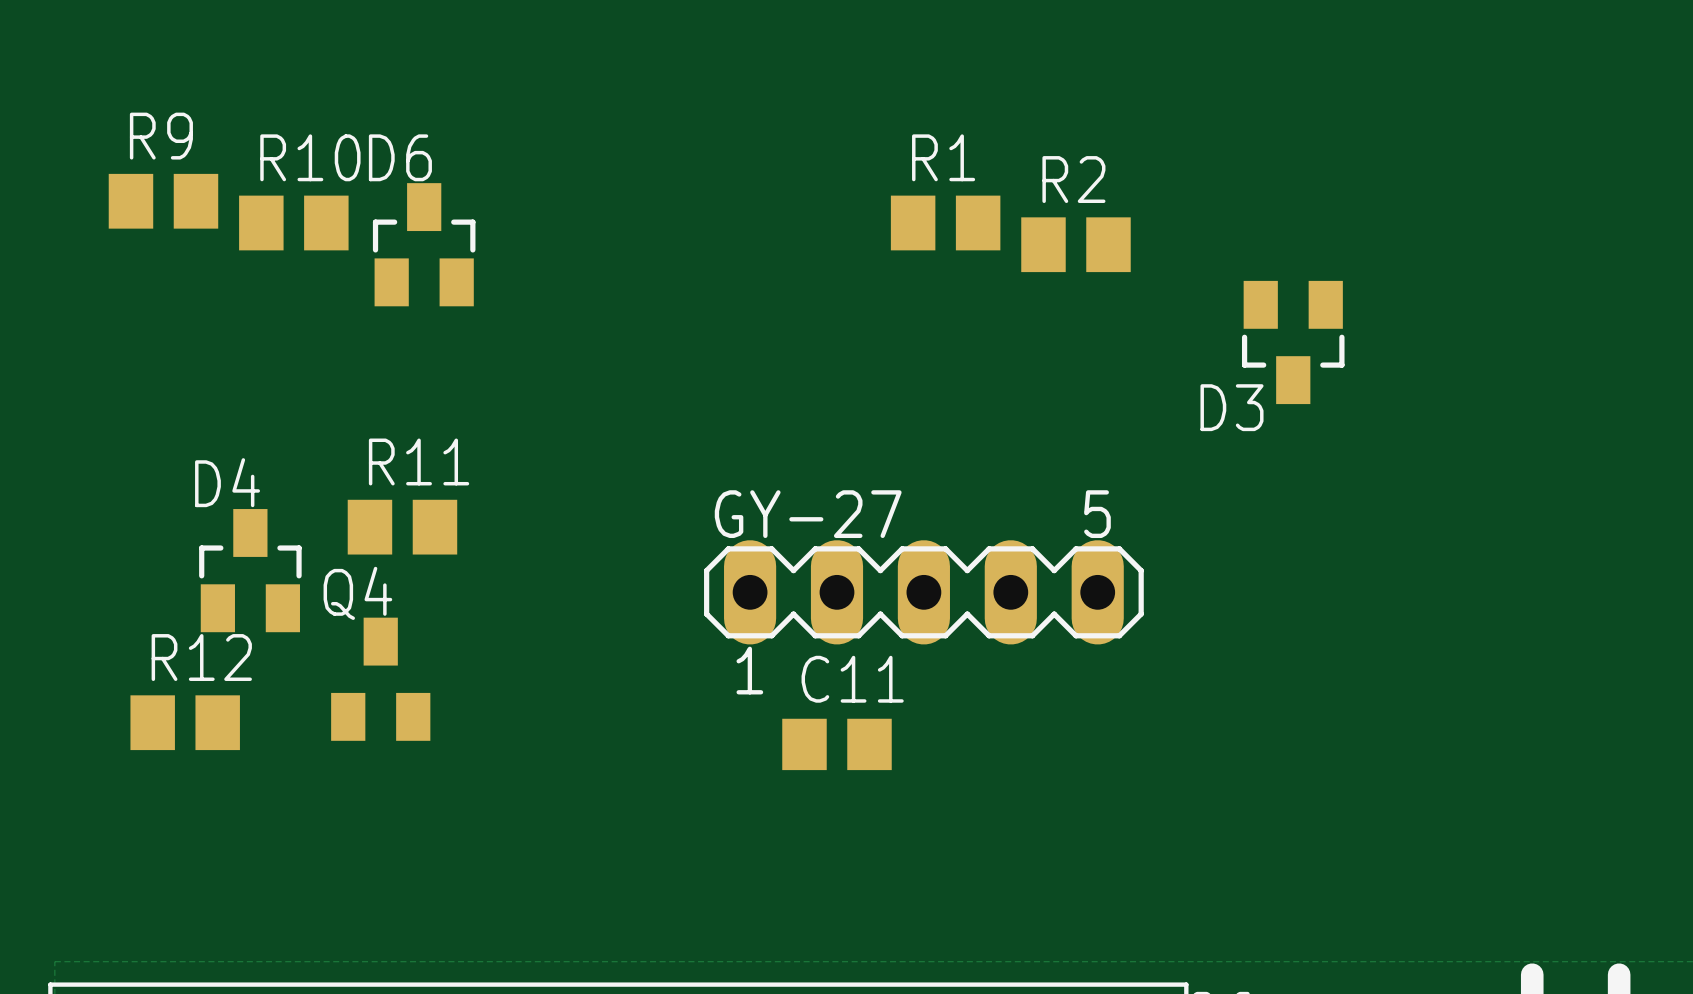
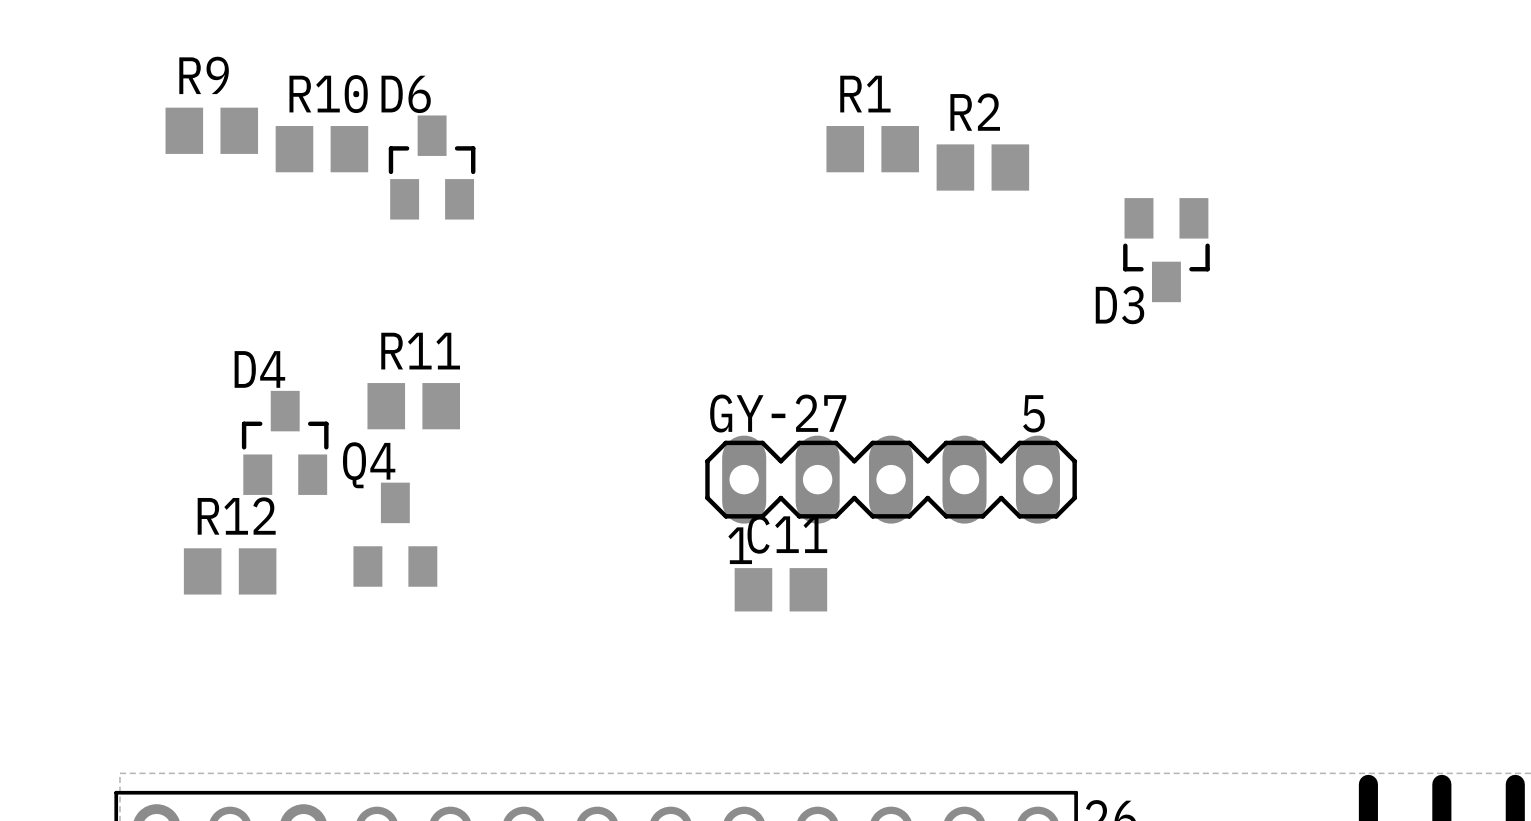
GY-27 position: (923, 592) -> (891, 479)

